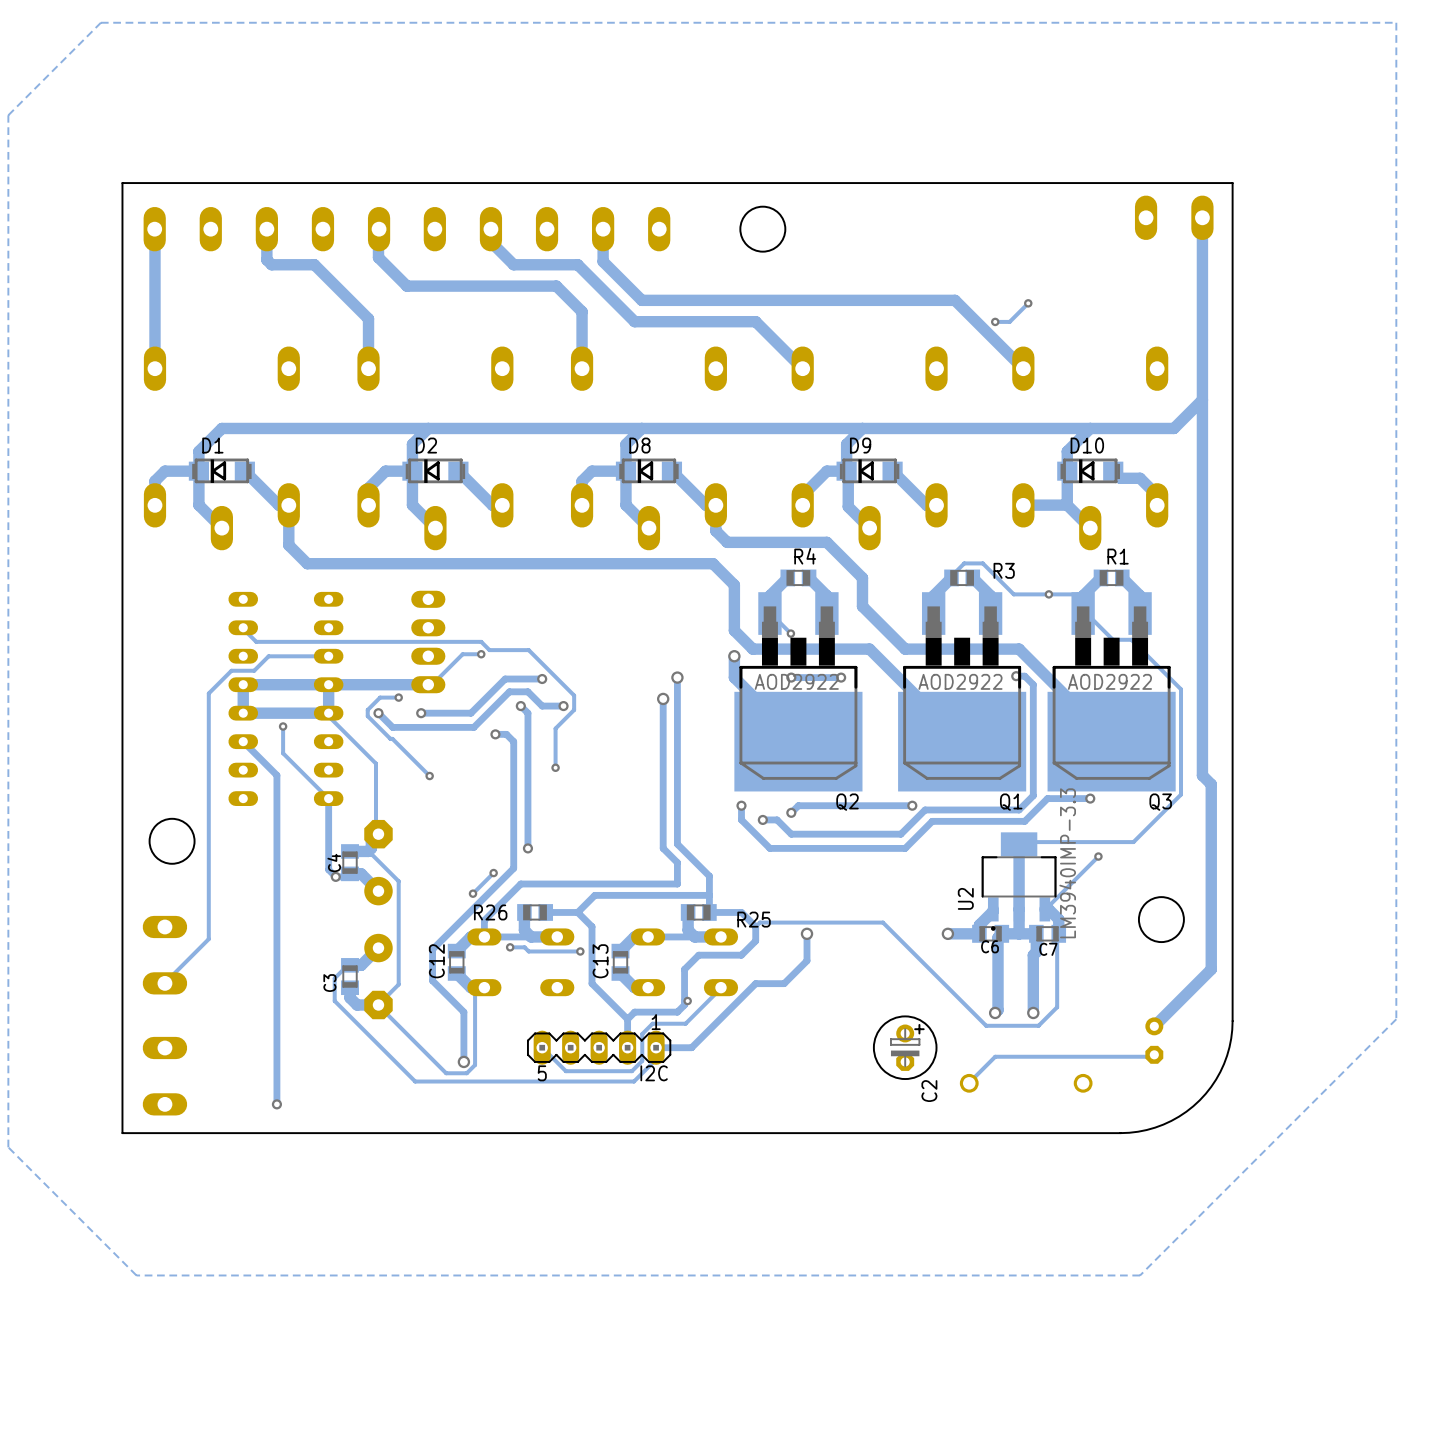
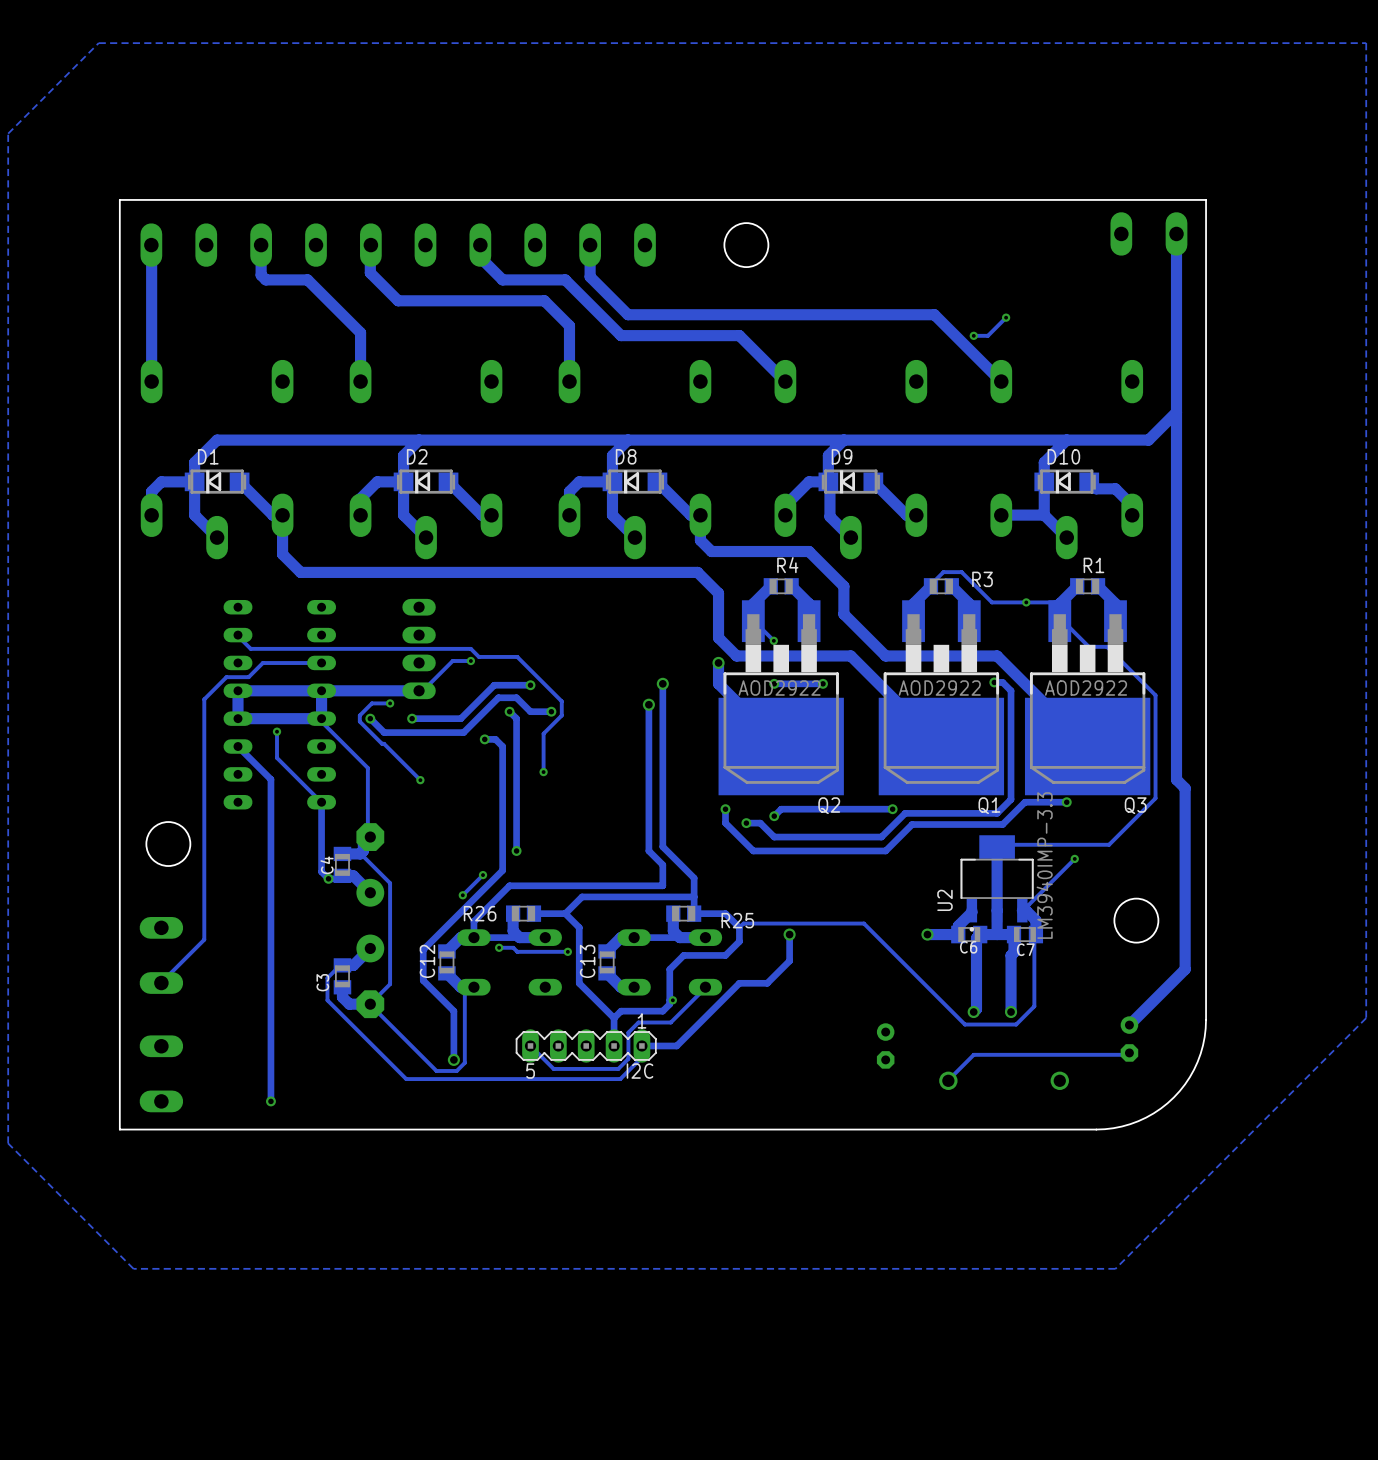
C2 side: bottom (905, 1047) -> top (885, 1045)

